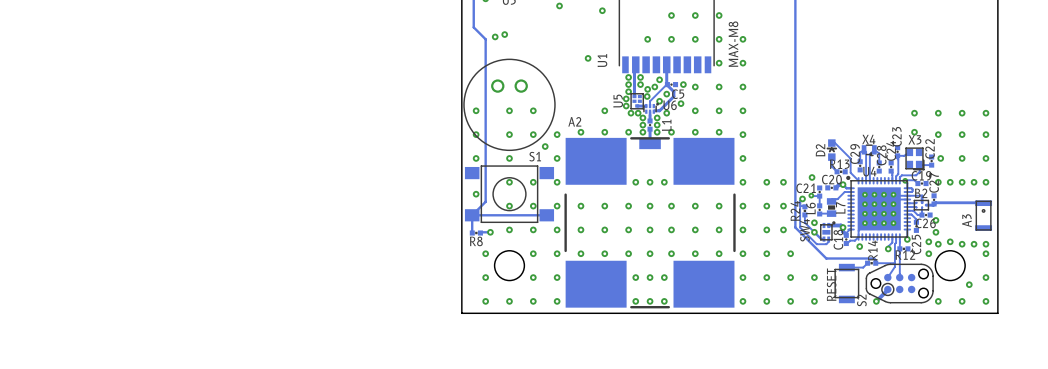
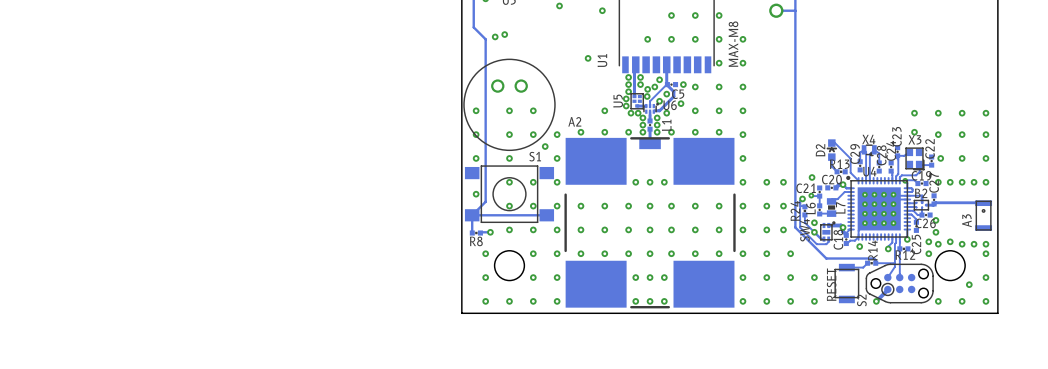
part: none -> (776, 10)
track: none -> (795, 10) (776, 10)

